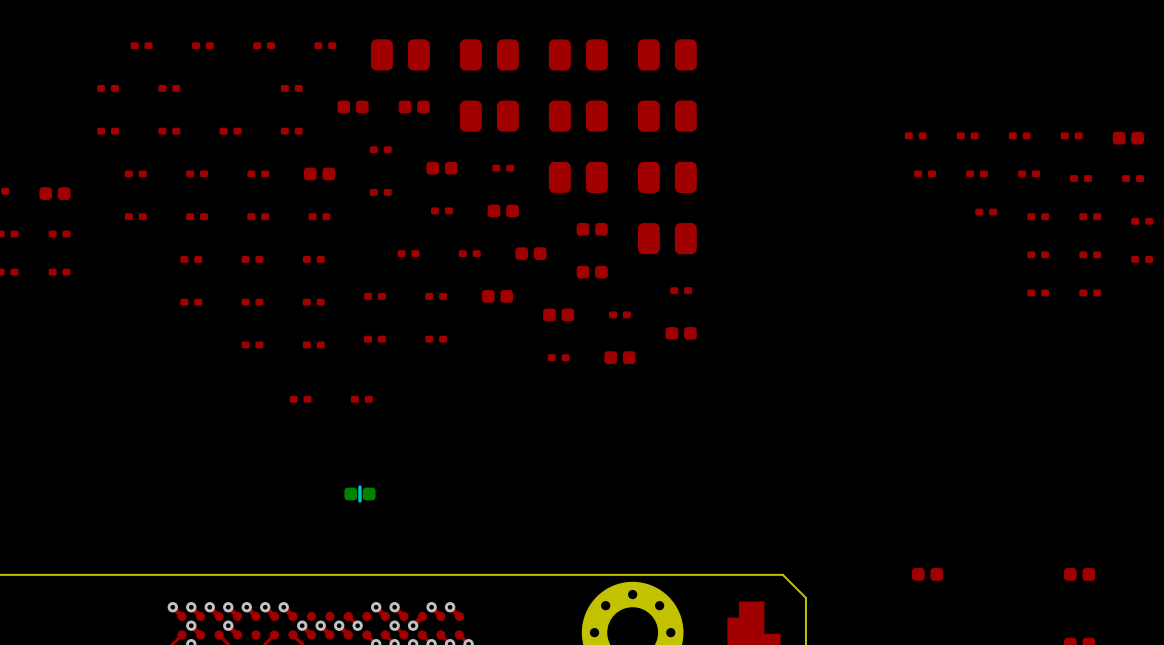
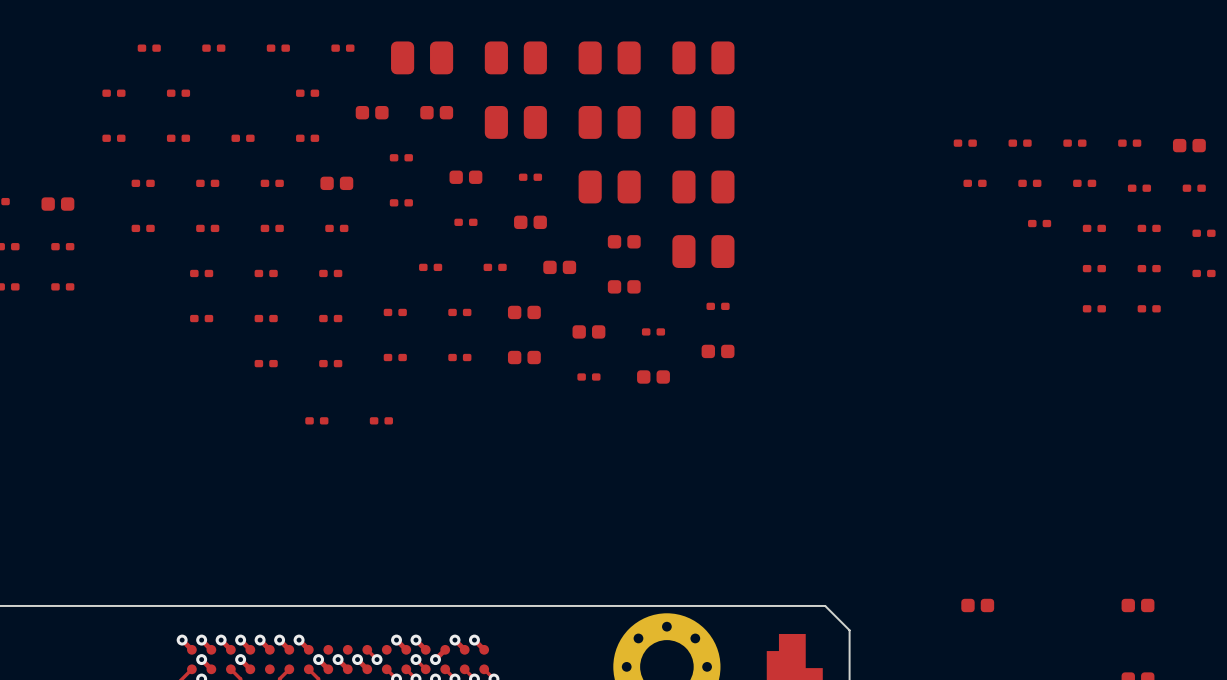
part side: bottom (359, 493) -> top (524, 357)

